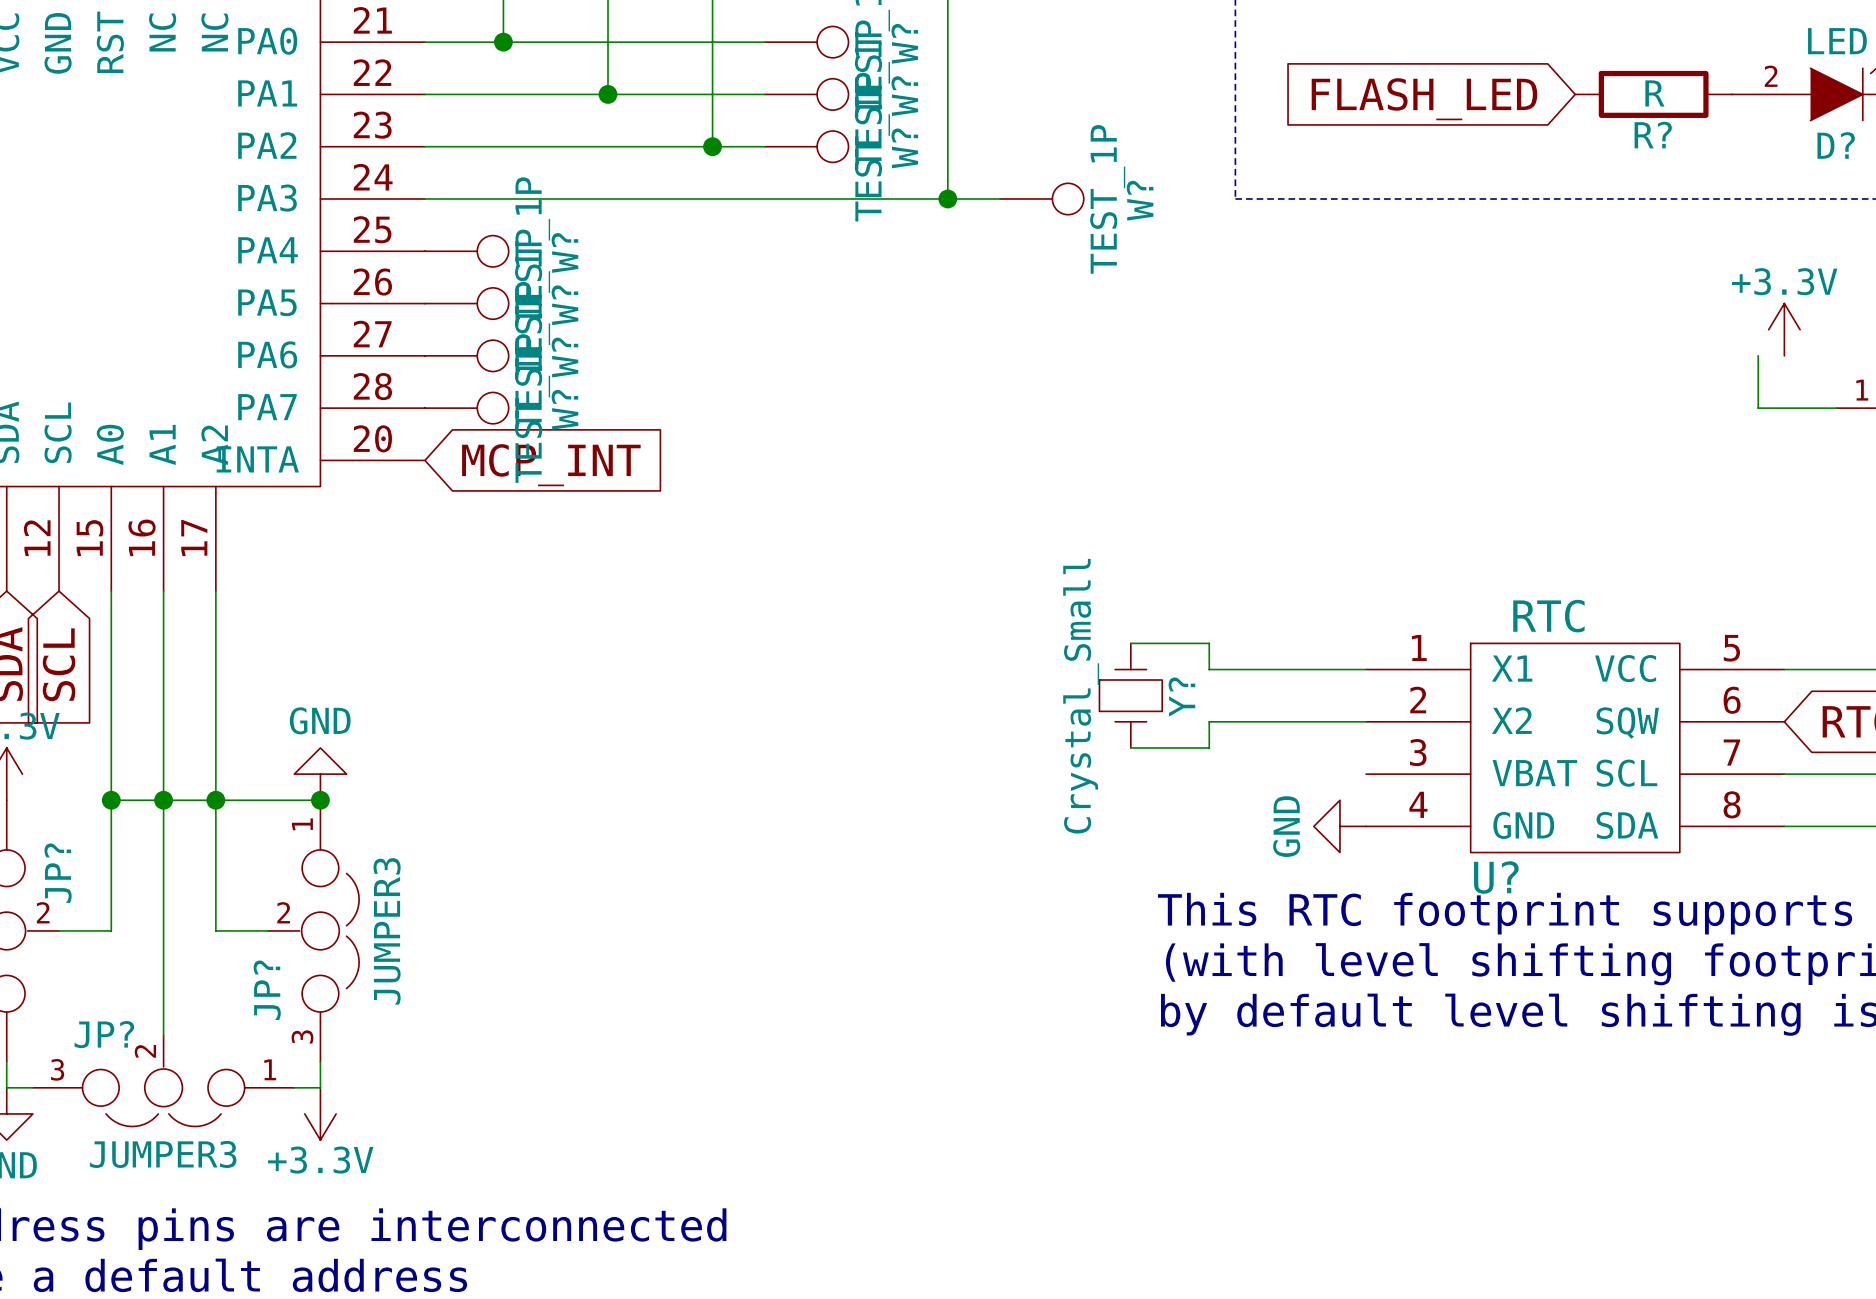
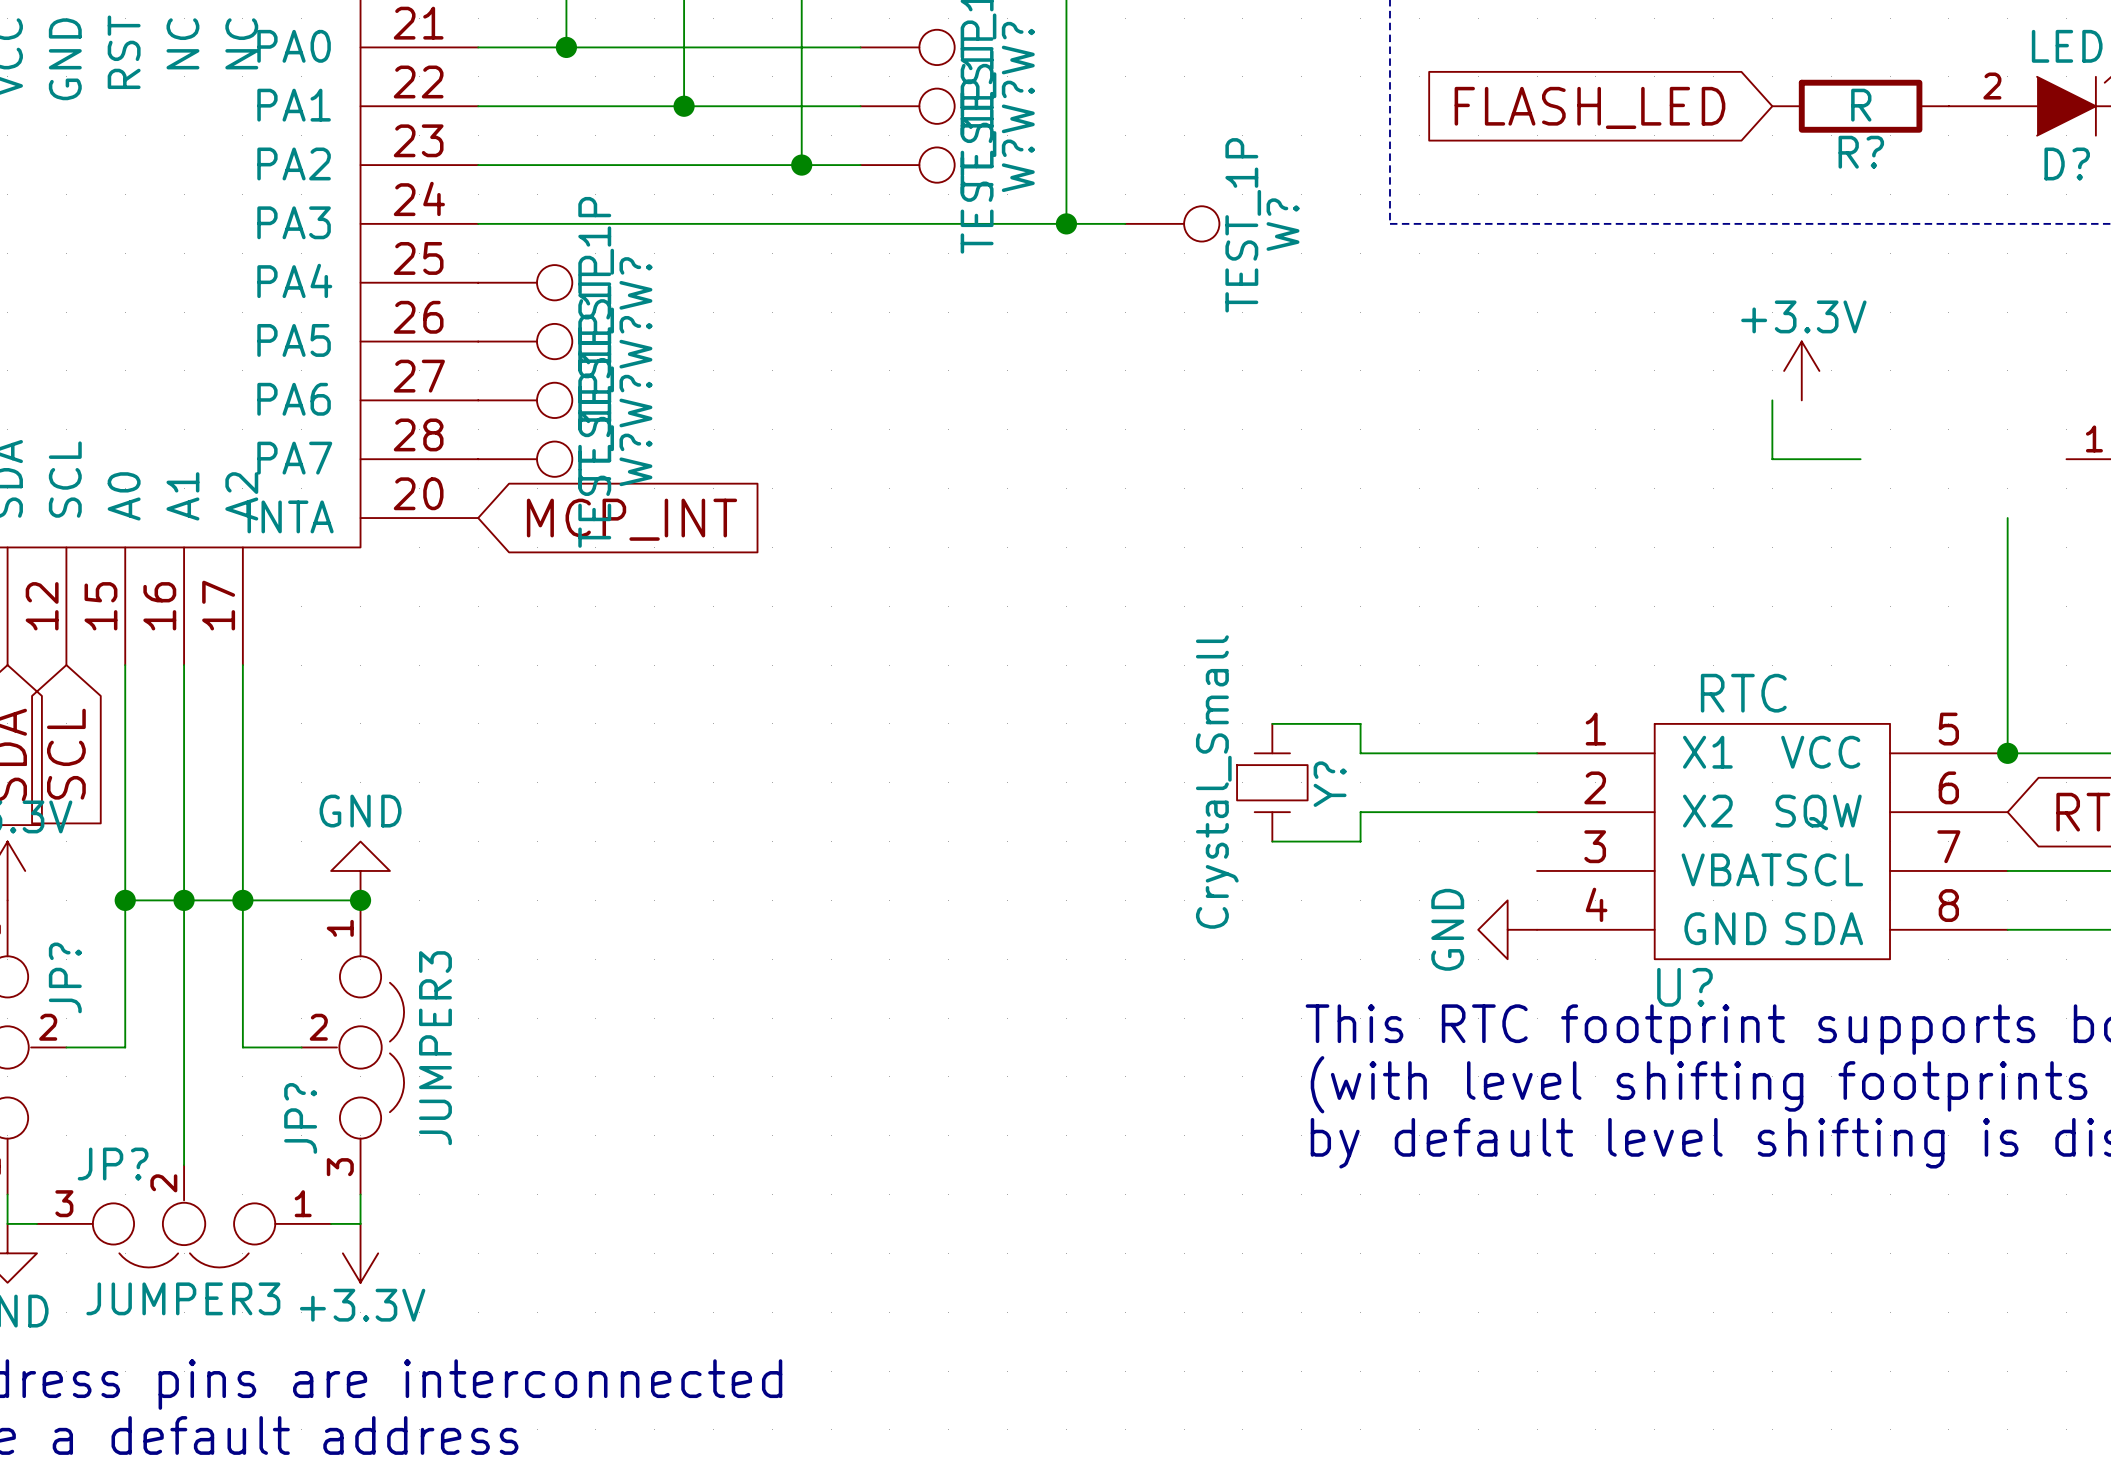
power symbol position: +3.3V (1784, 329) -> +3.3V (1801, 370)
wire: (1758, 355) (1758, 408) (1836, 408) -> (1772, 400) (1772, 459) (1860, 459)
wire: none -> (2007, 518) (2007, 753)
junction: none -> (2007, 753)

